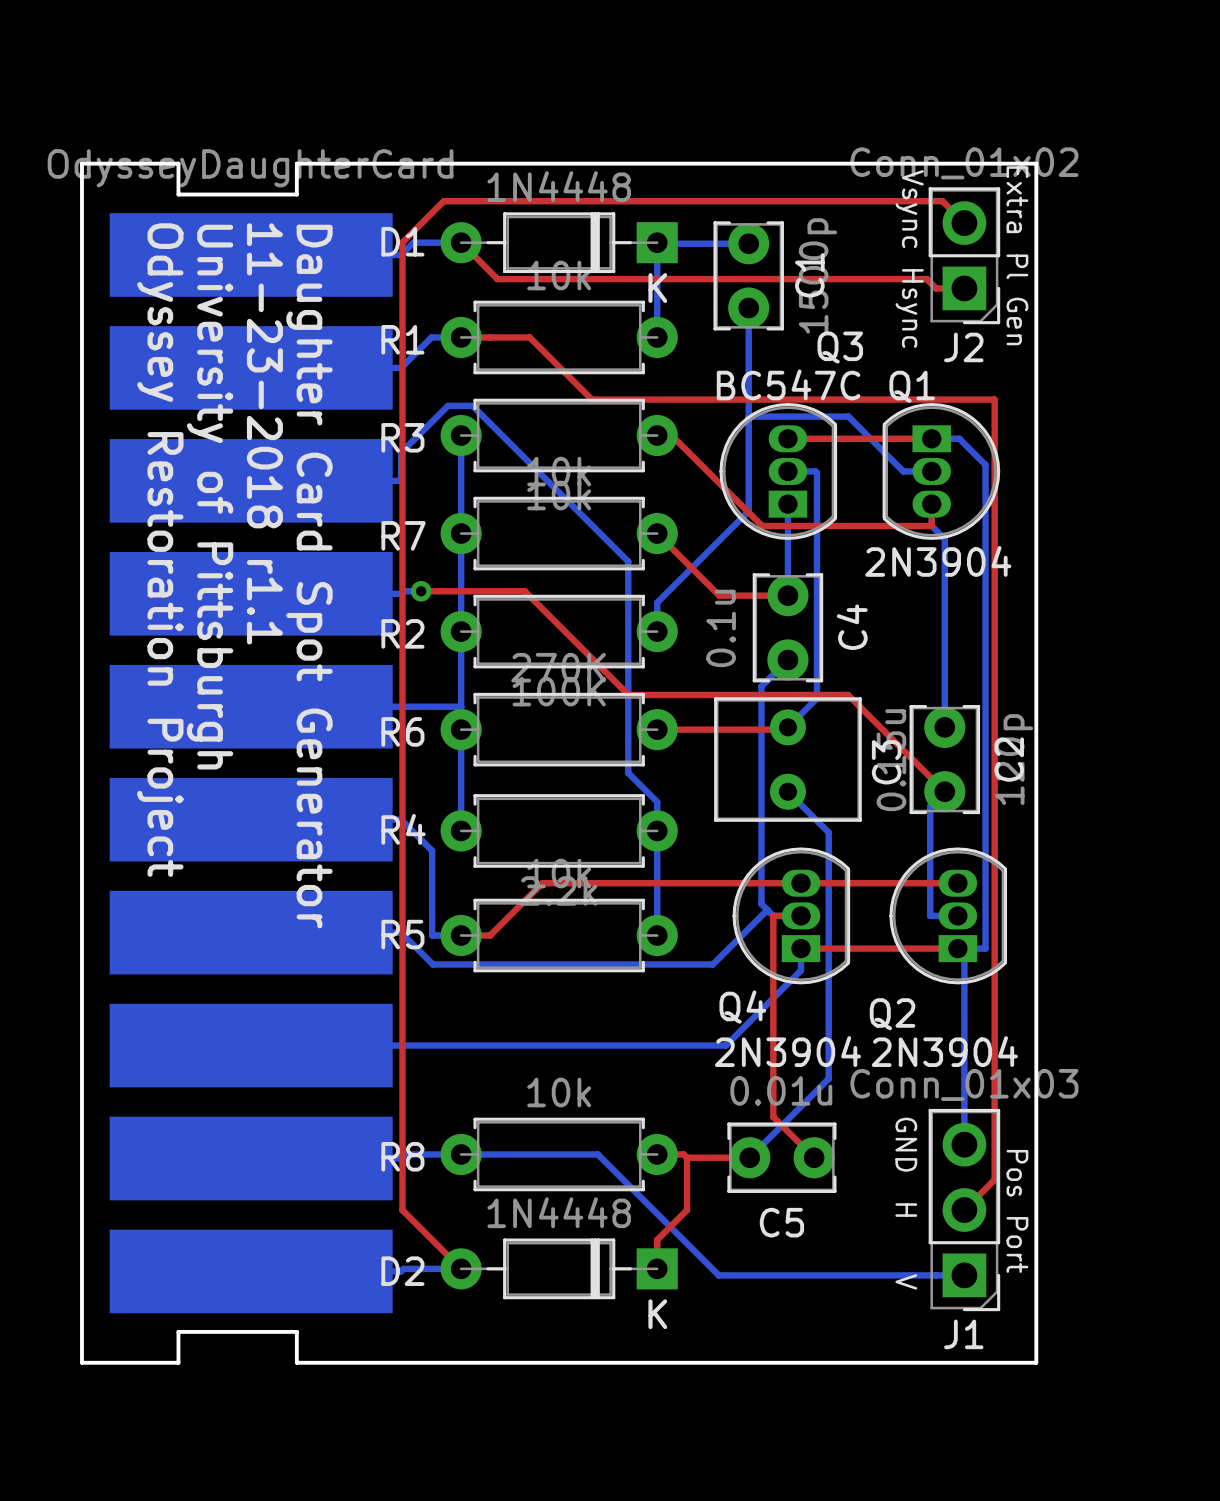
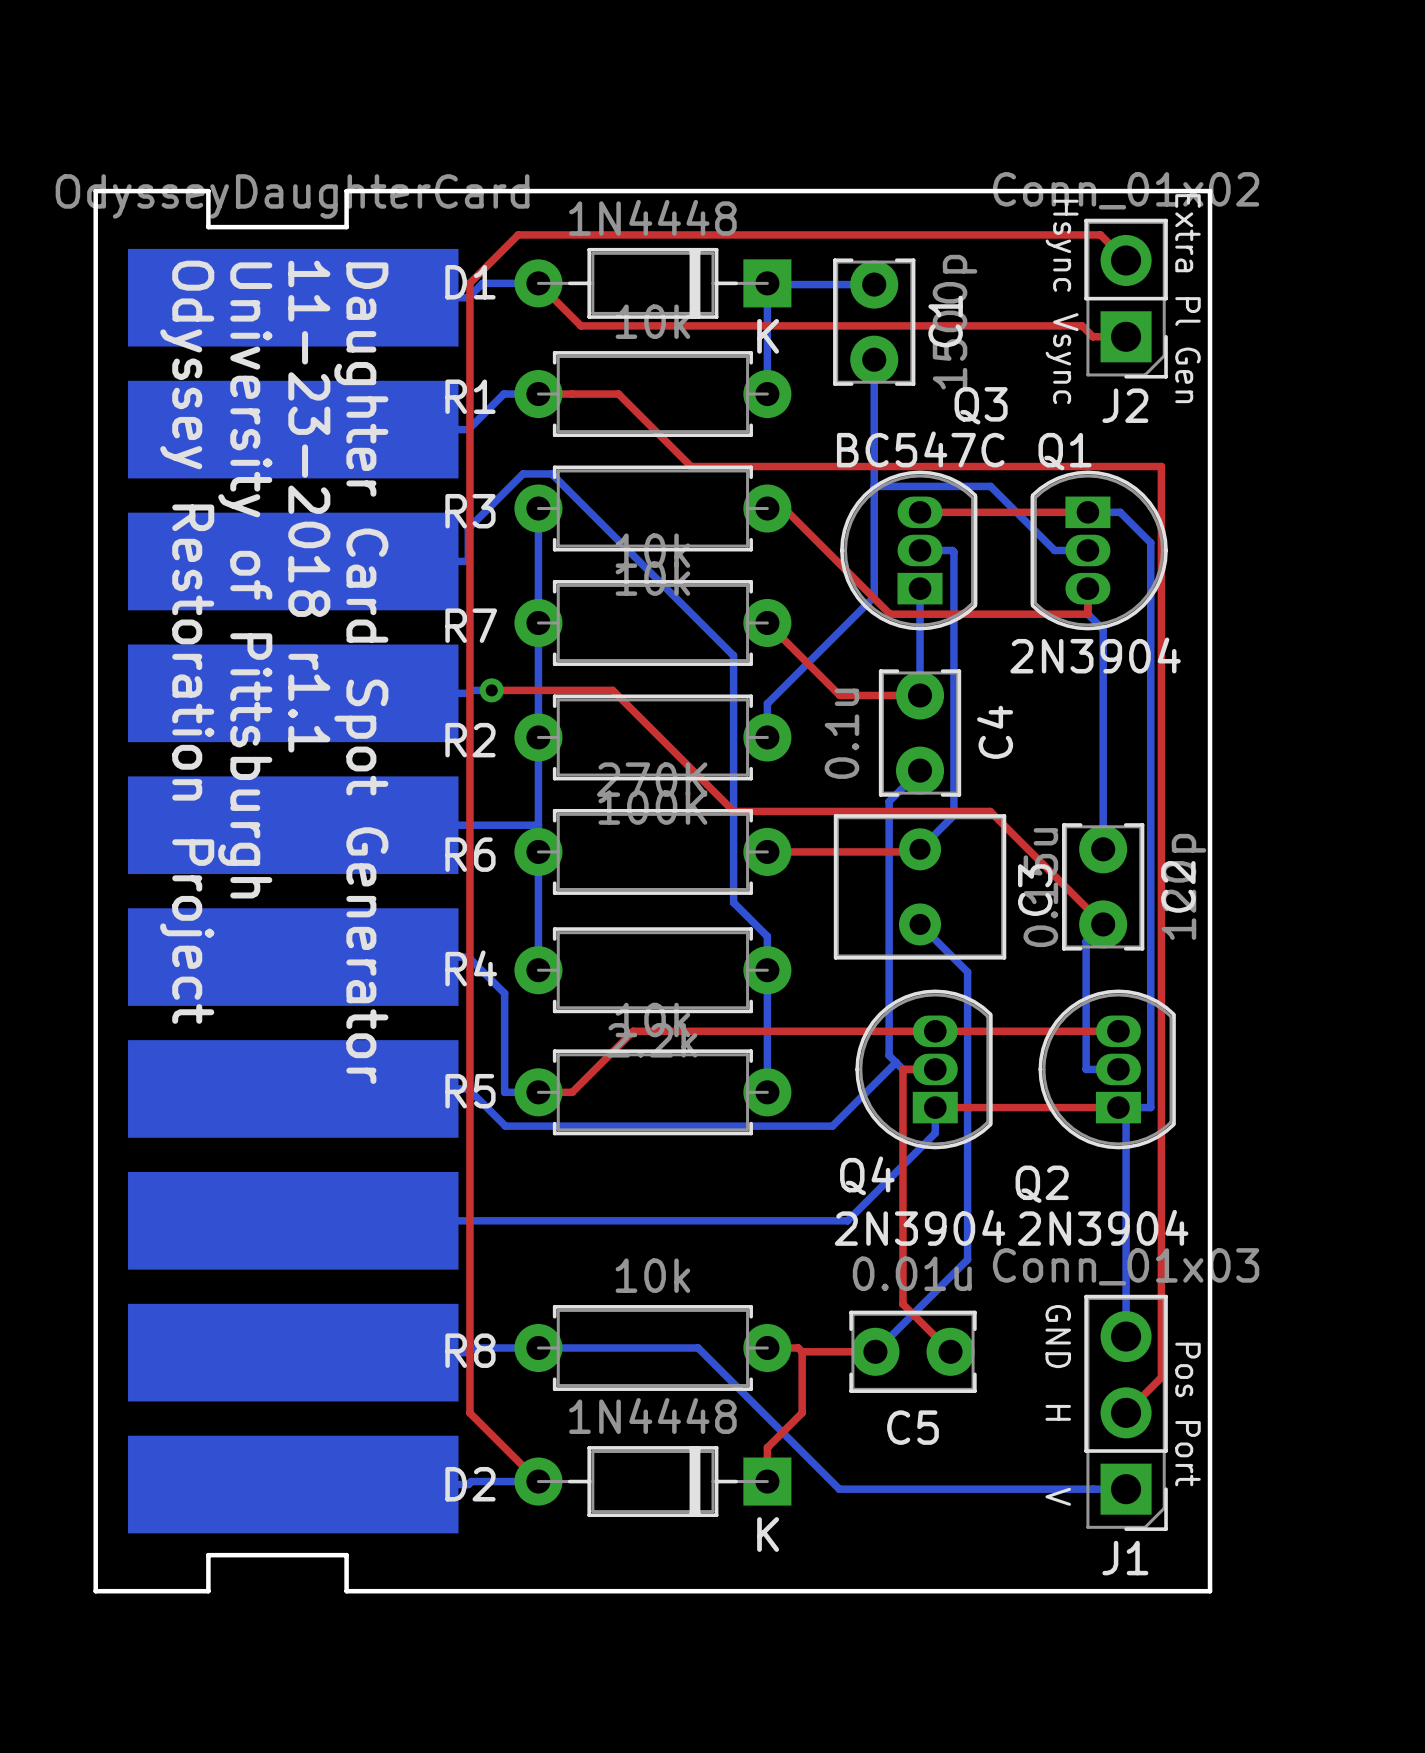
text: Vsync (909, 209) -> Hsync (1062, 245)
text: Hsync (909, 308) -> Vsync (1062, 358)

